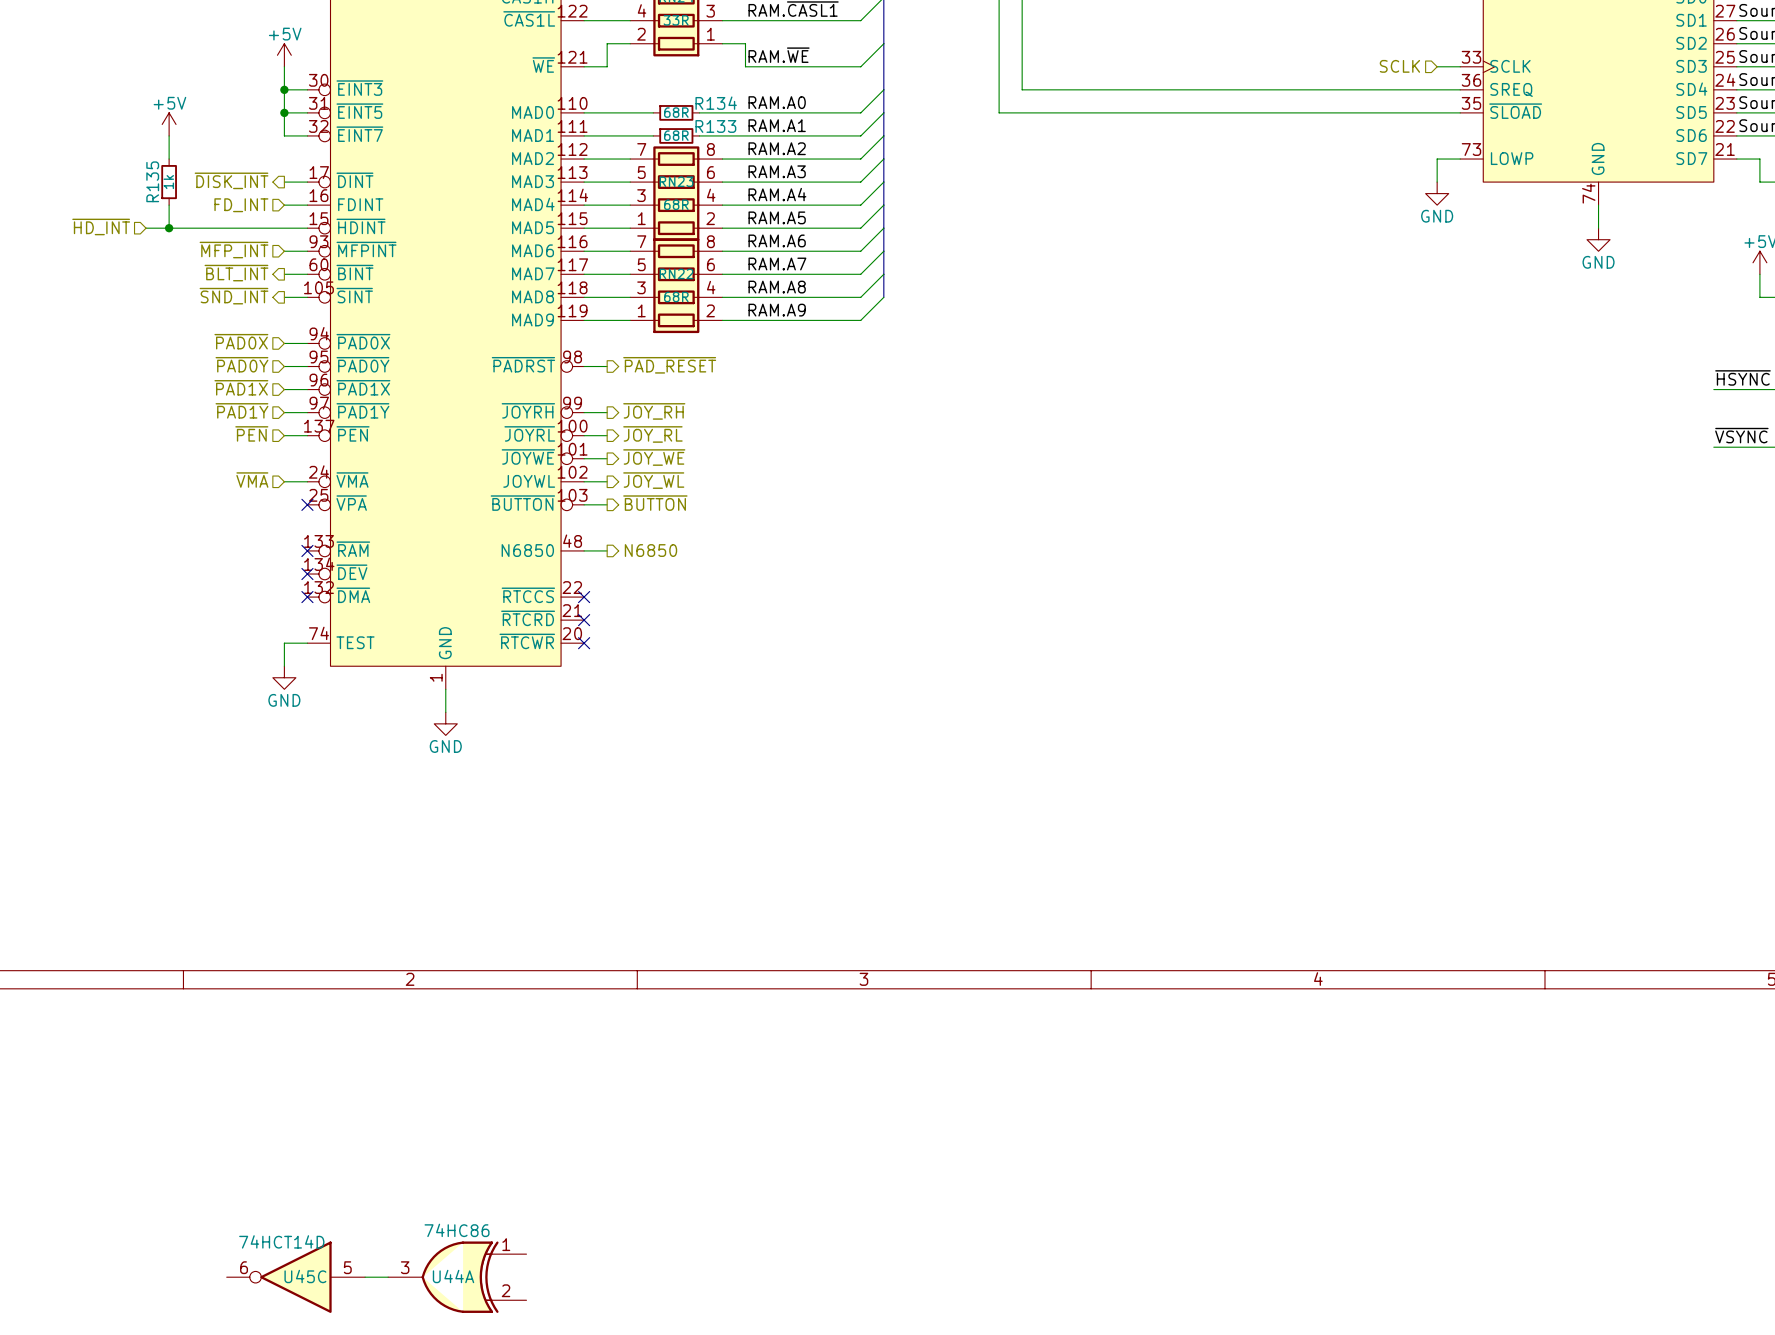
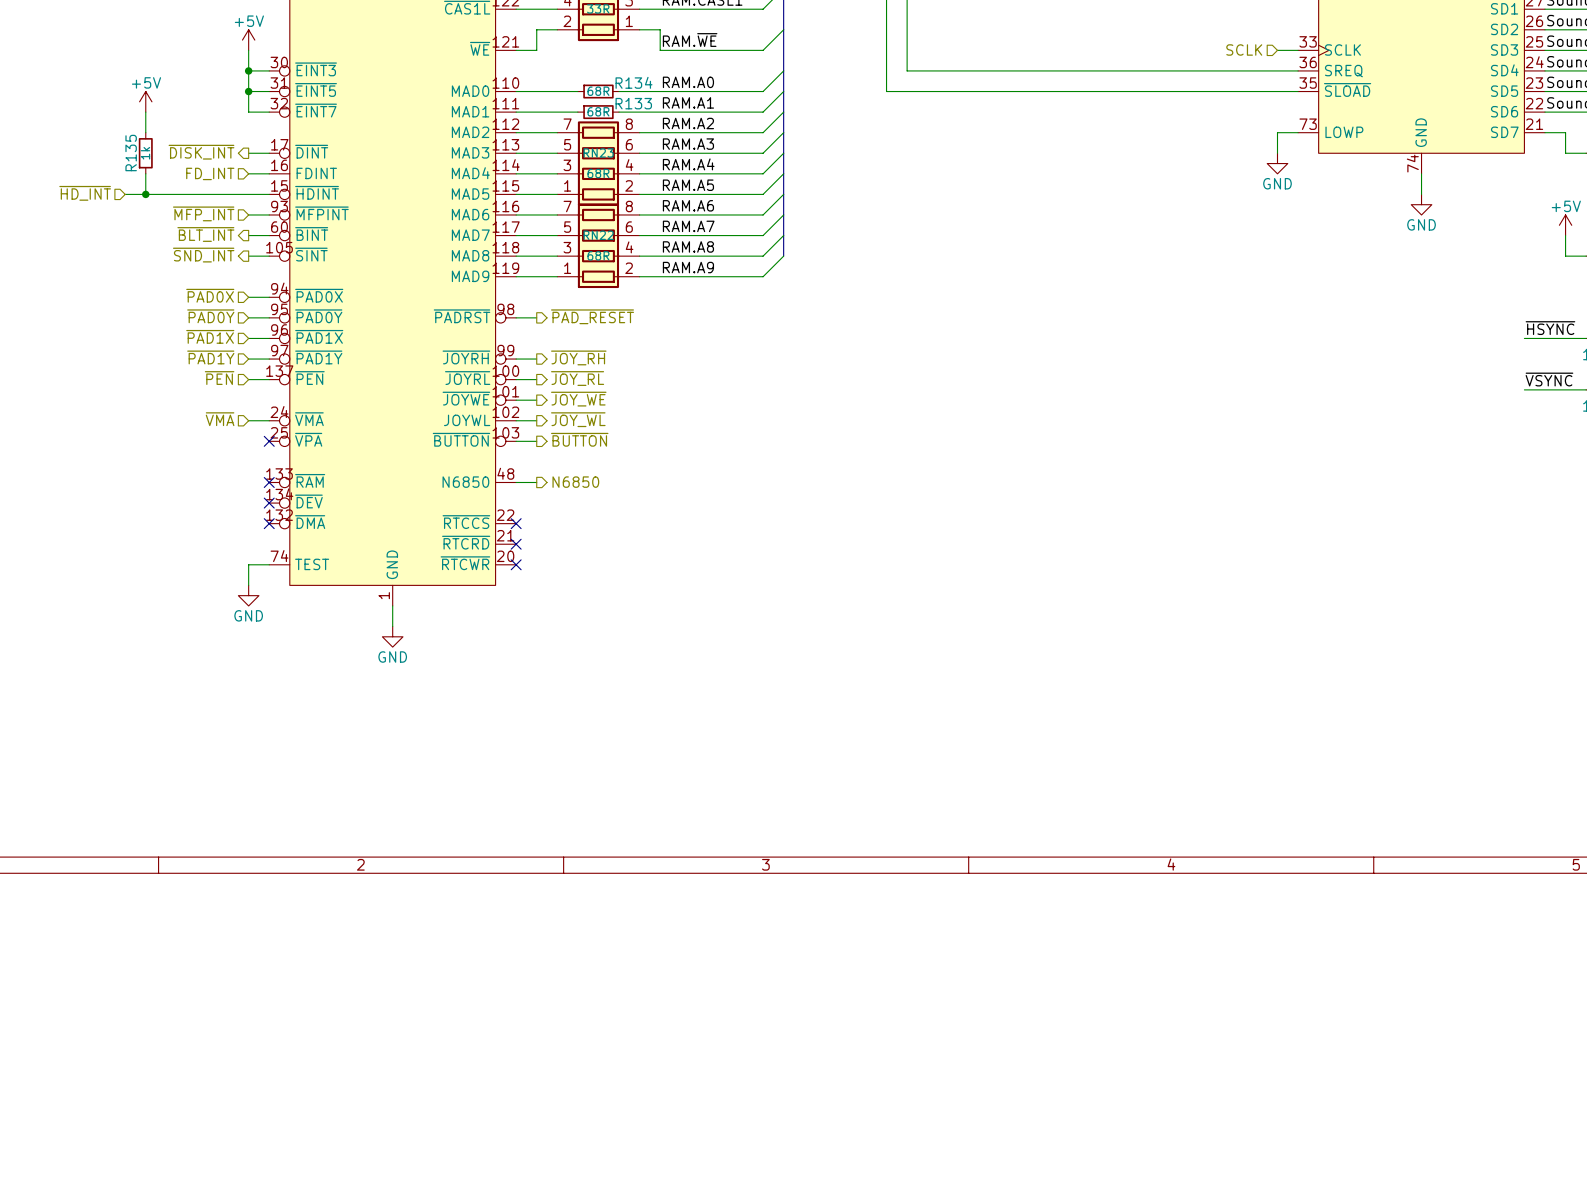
U45C: 74HCT14D (295, 1277) -> none
wire: (365, 1277) (388, 1277) -> none
U44A: 74HC86 (457, 1277) -> none

